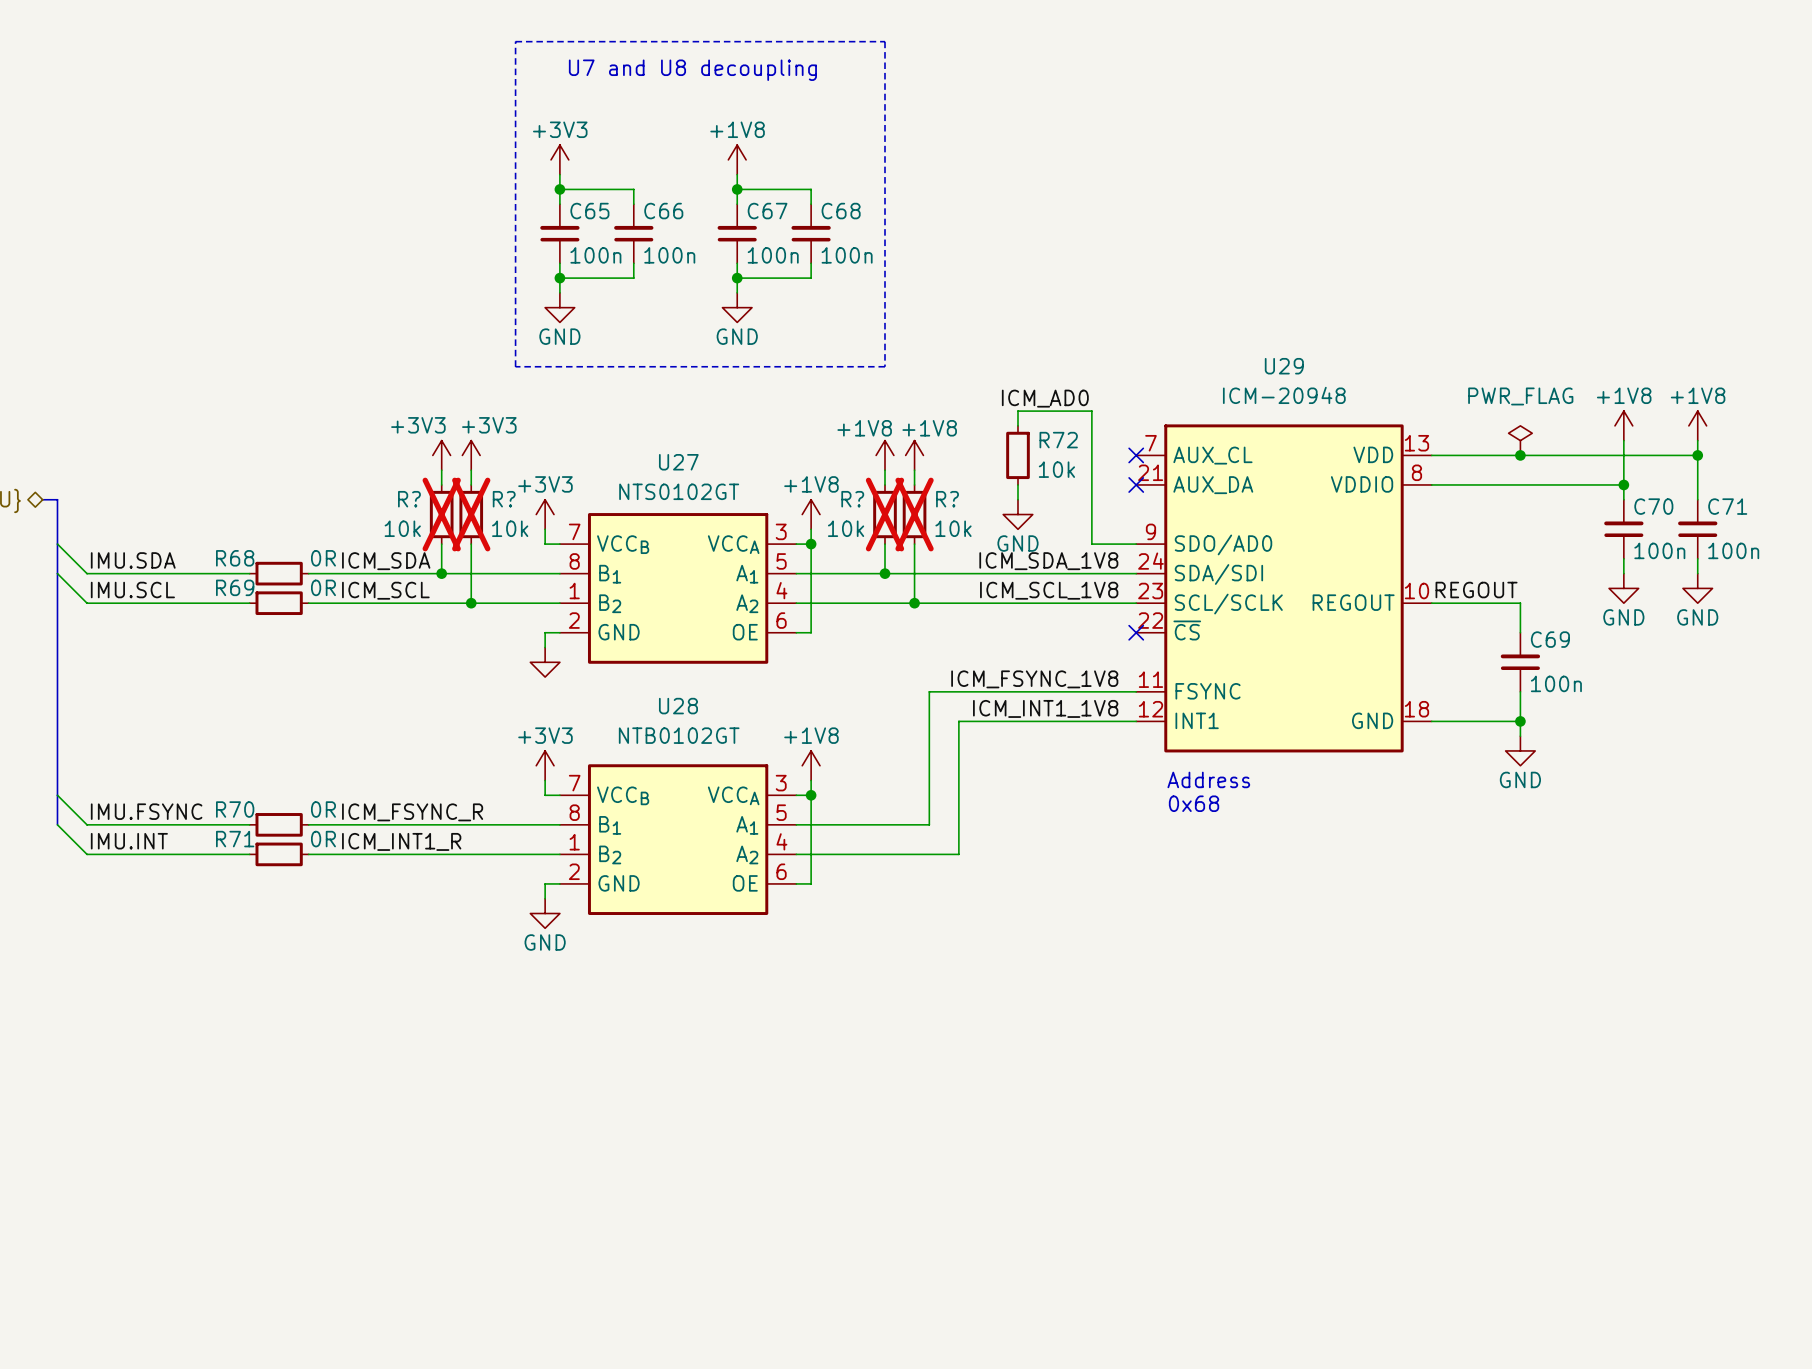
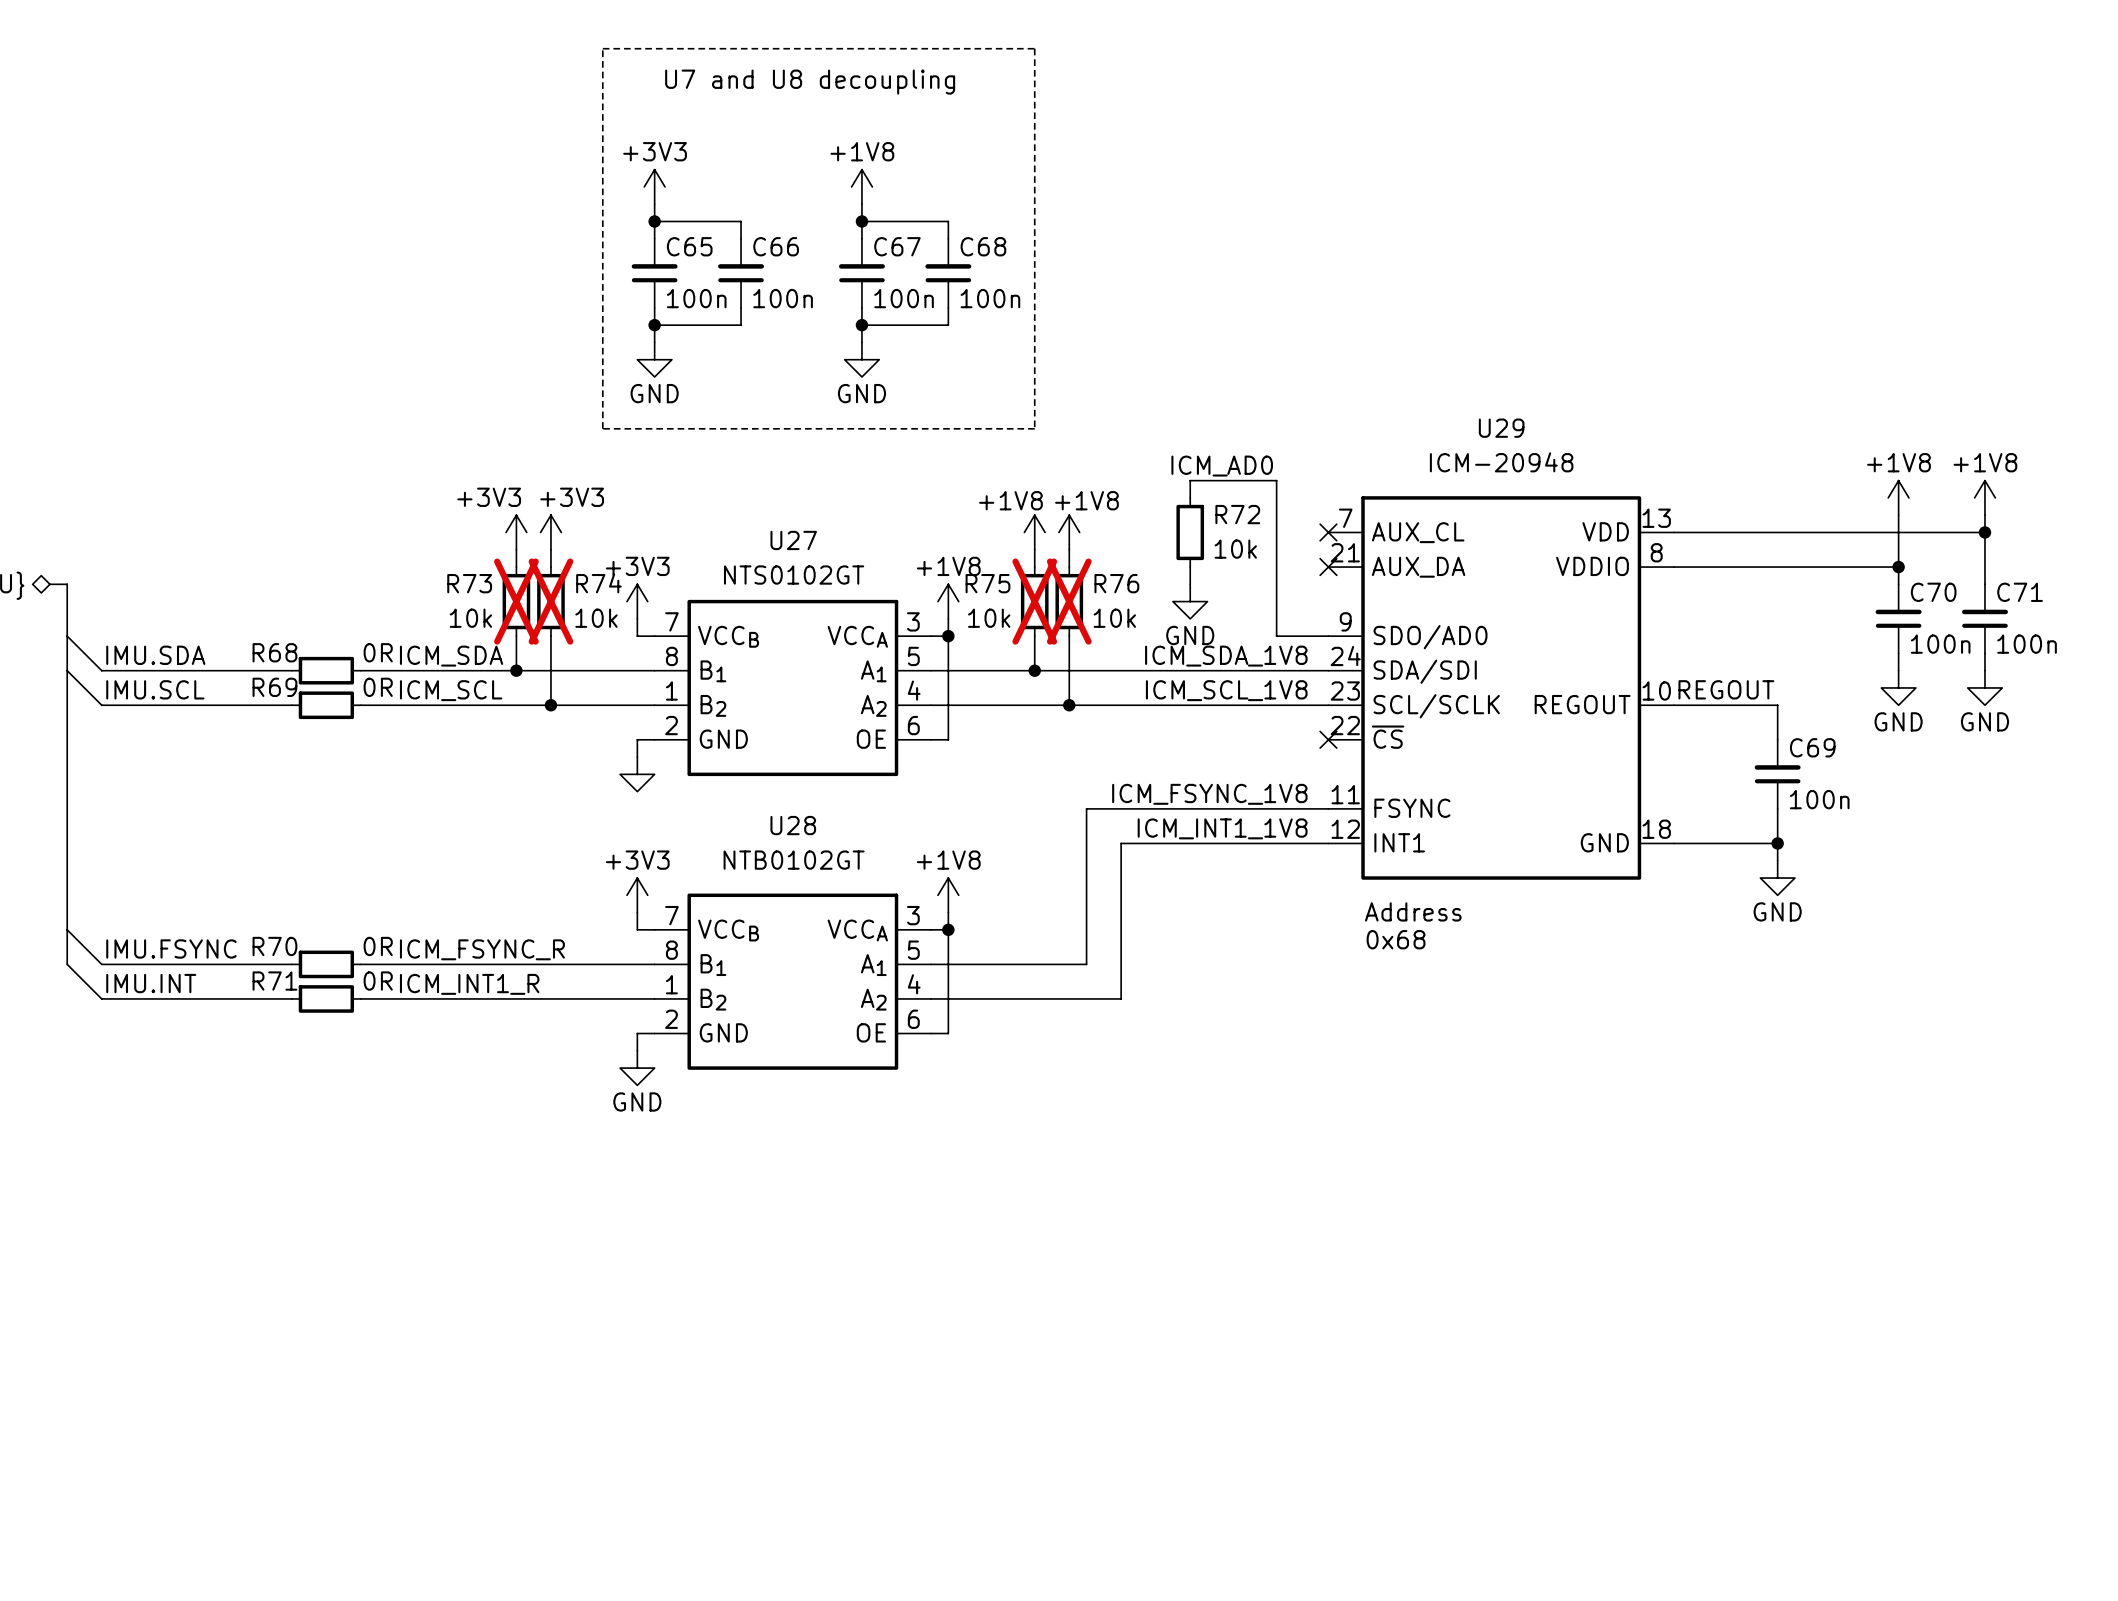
power symbol: PWR_FLAG (1520, 440) -> none
junction: (1520, 455) -> none
R? name: R? (409, 499) -> R73 (469, 583)
R? name: R? (504, 499) -> R74 (598, 583)
R? name: R? (852, 499) -> R75 (987, 583)
R? name: R? (947, 499) -> R76 (1116, 583)

